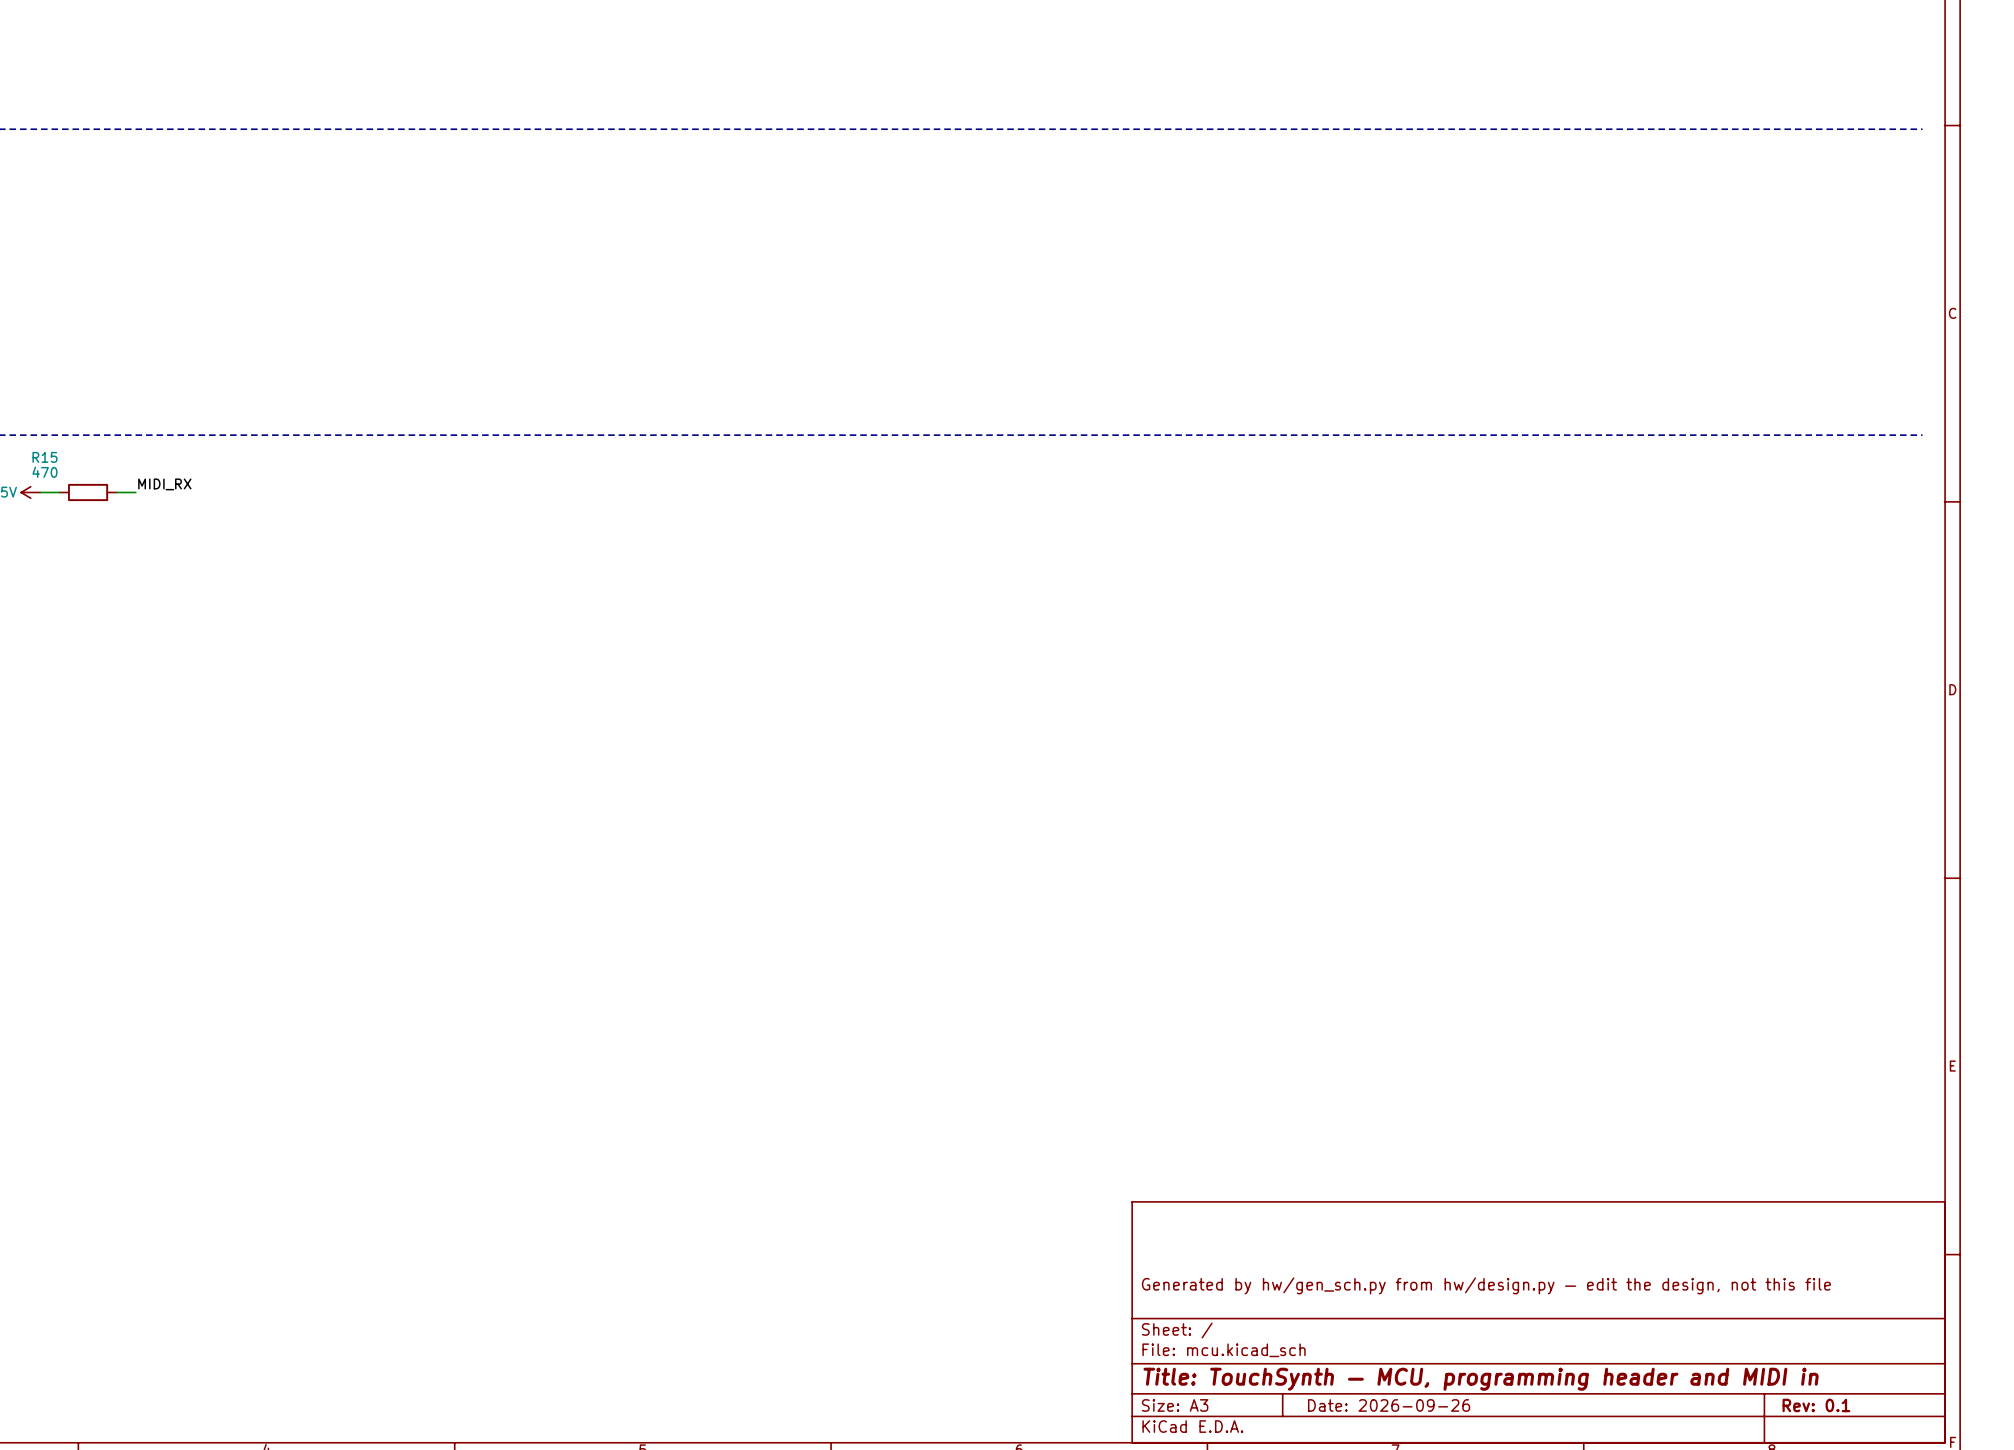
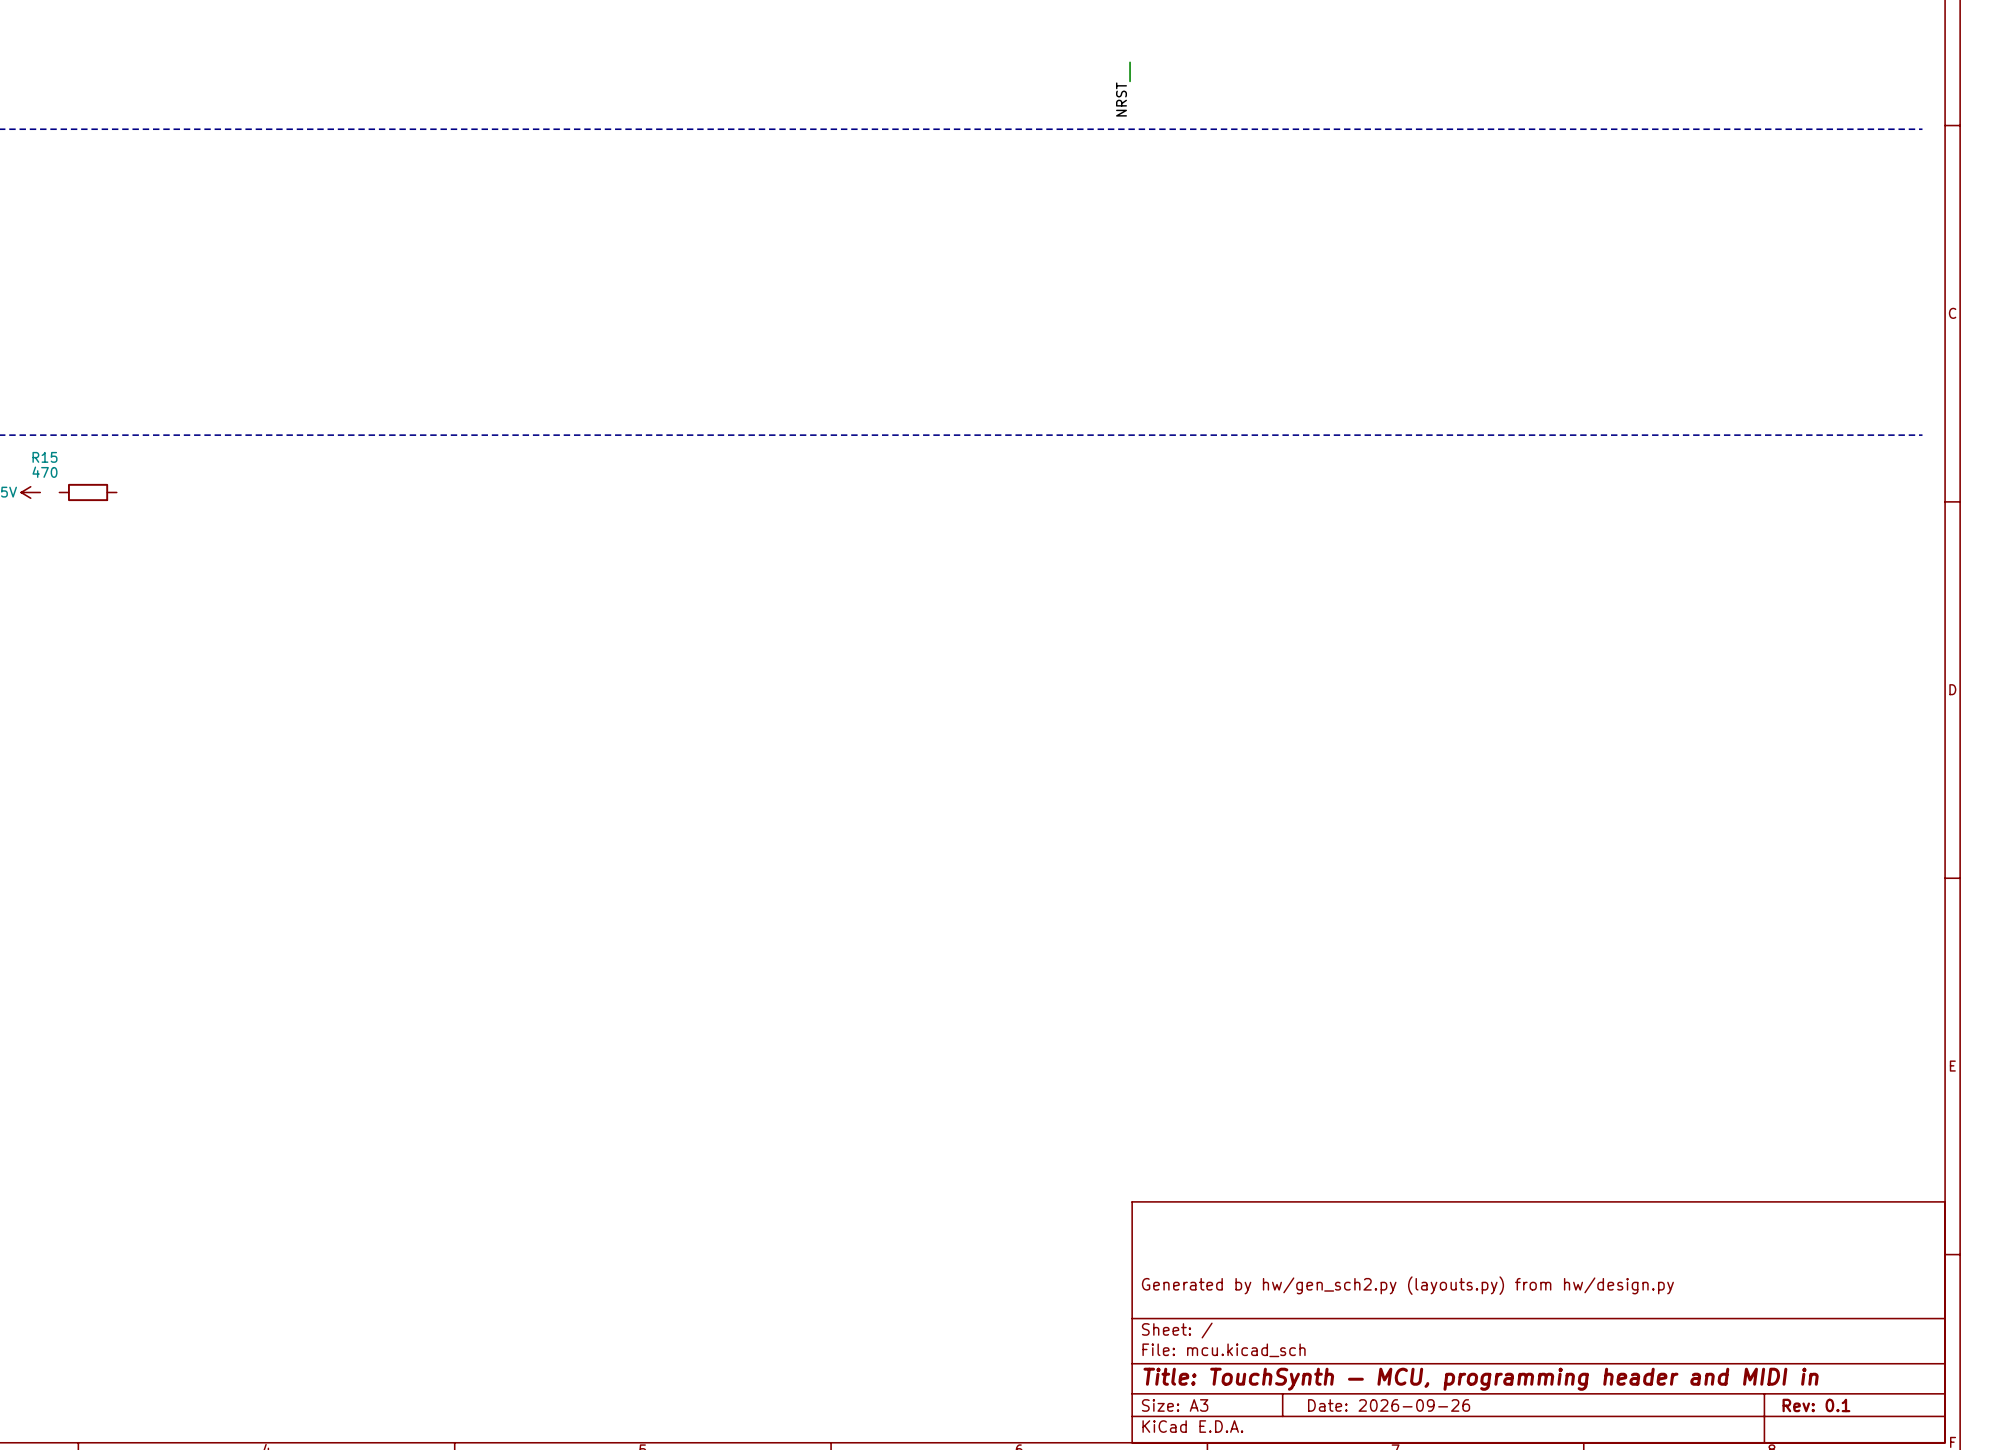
wire: none -> (1130, 62) (1130, 81)
label: none -> NRST (1121, 99)
label: MIDI_RX (164, 484) -> none
wire: (40, 492) (59, 492) -> none
wire: (116, 492) (135, 492) -> none
title block: Generated by hw/gen_sch.py from hw/design.py — edit the design, not this file (1486, 1285) -> Generated by hw/gen_sch2.py (layouts.py) from hw/design.py (1407, 1285)

